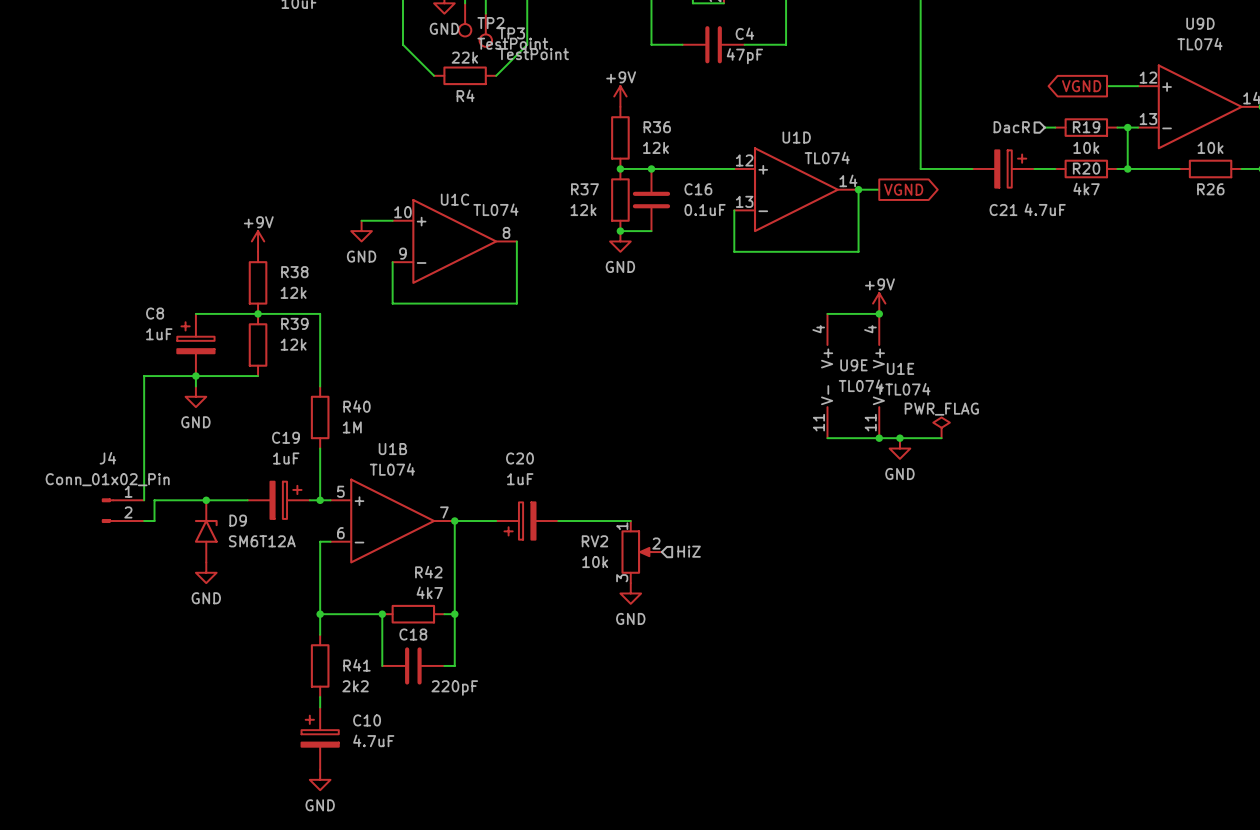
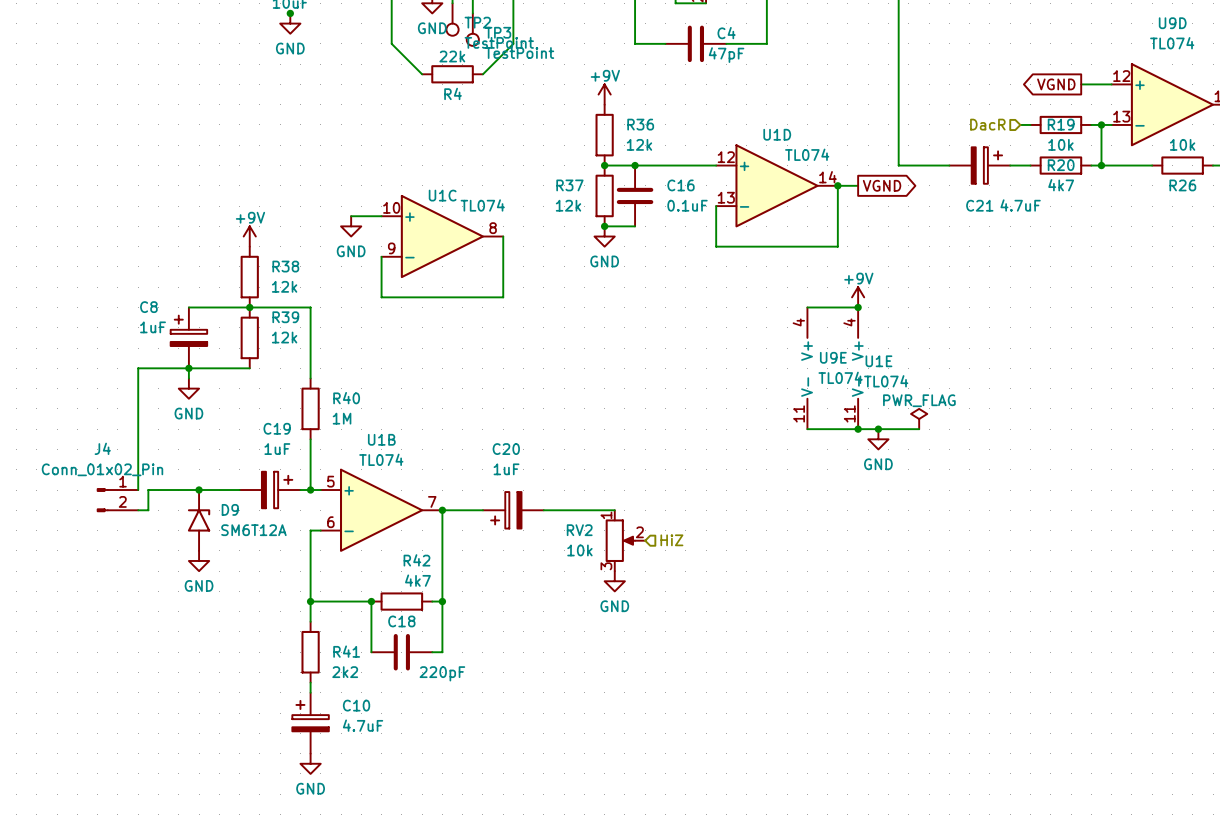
junction: none -> (290, 13)
power symbol: none -> GND (290, 23)

